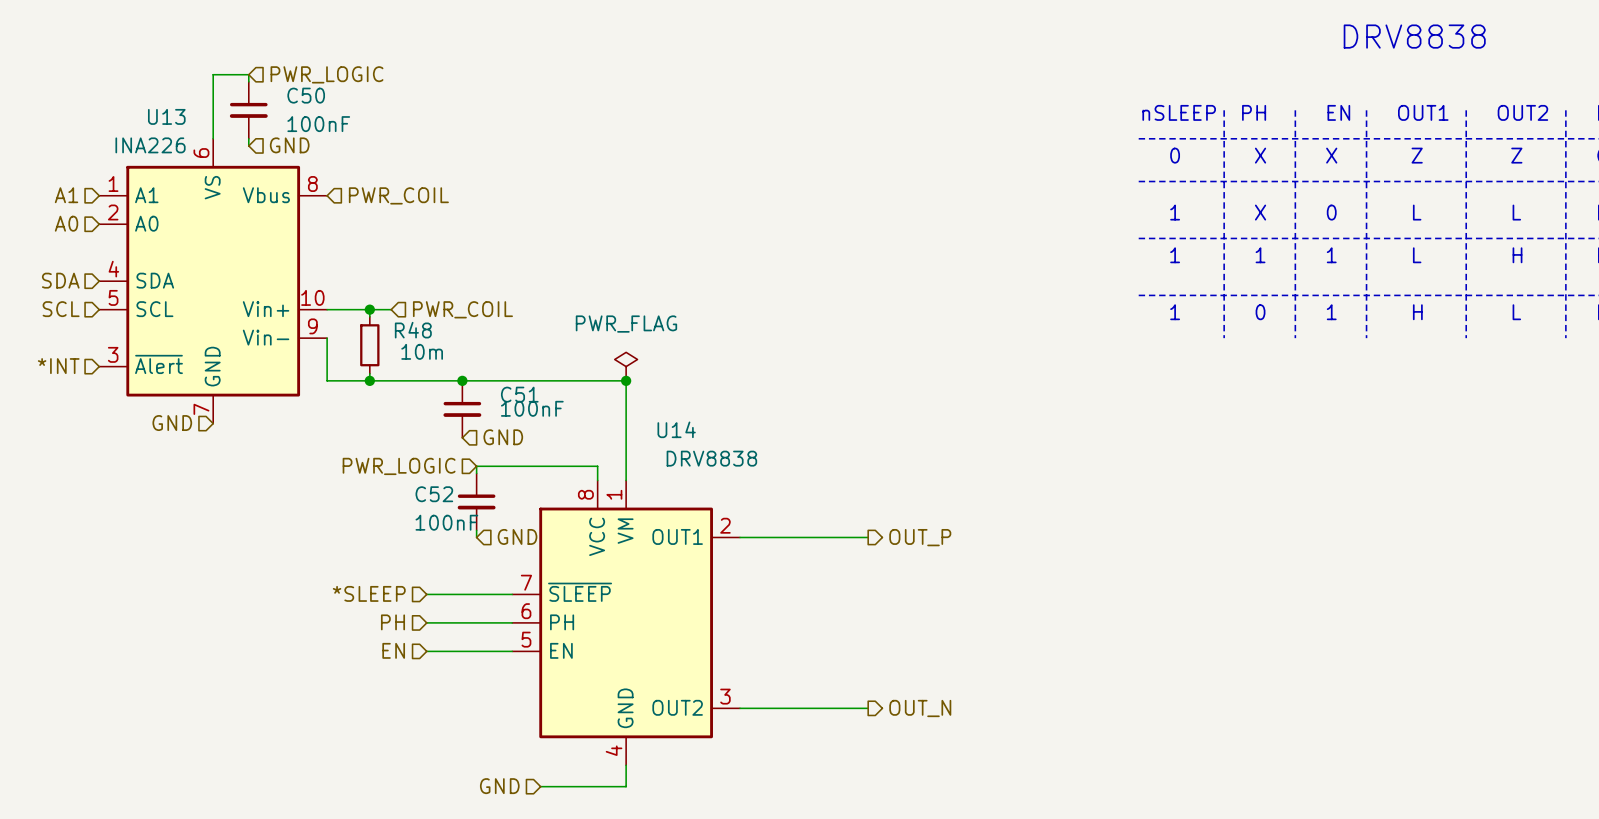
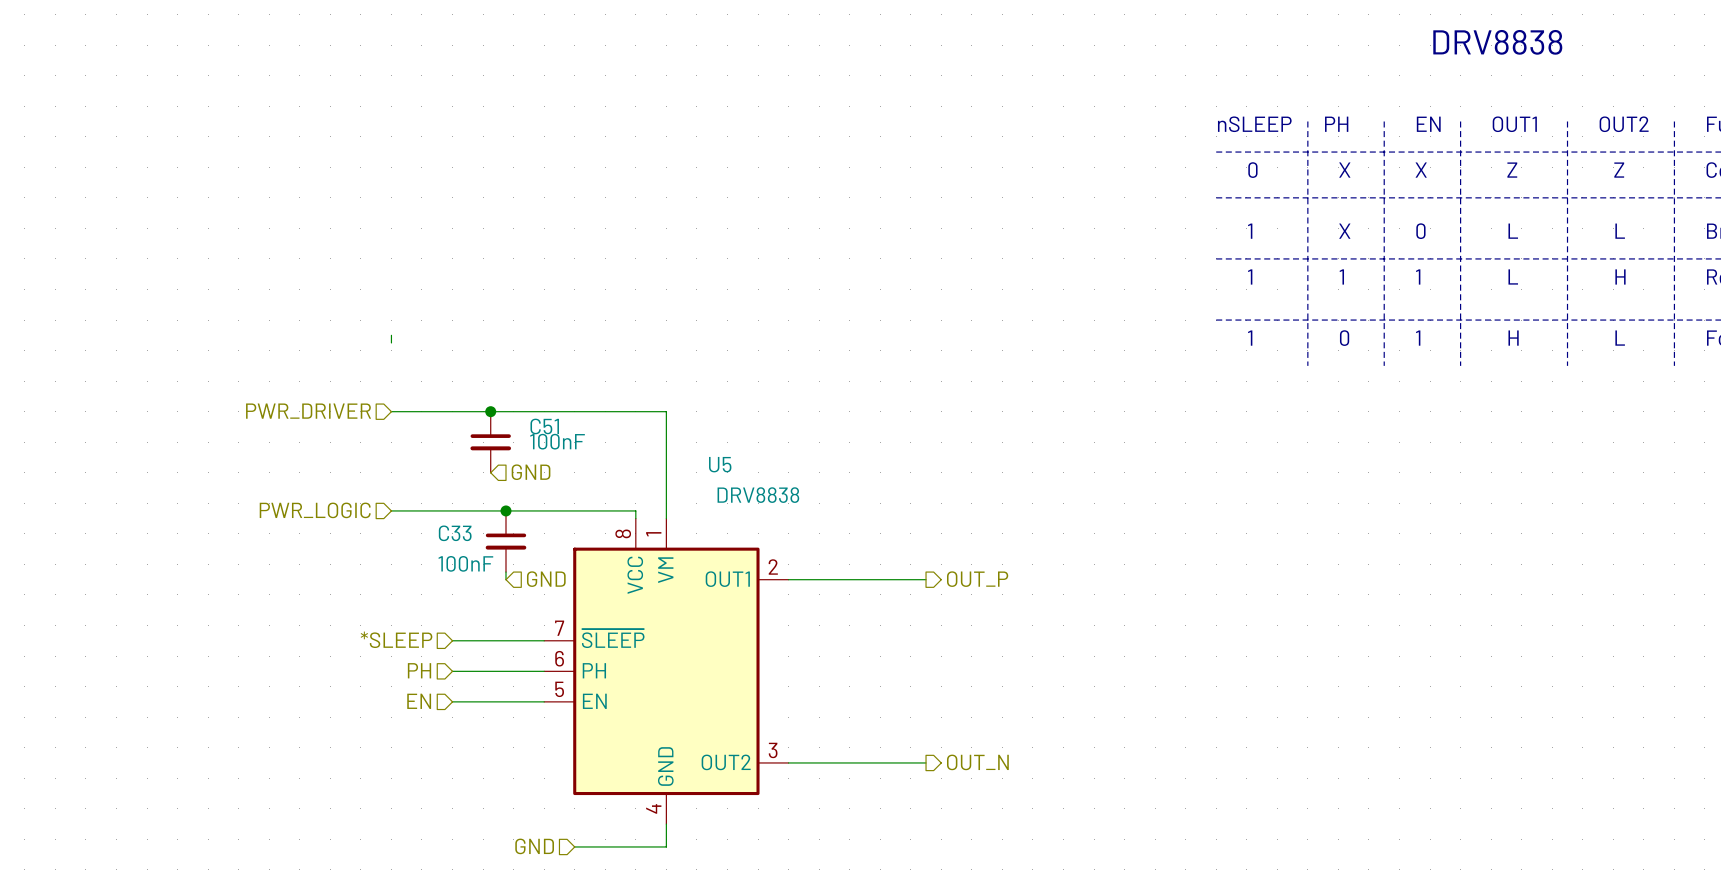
hierarchical label: PWR_LOGIC (326, 74) -> none
wire: (248, 81) (248, 74) (213, 74) (213, 138) -> none
C50: 100nF (248, 110) -> none
wire: (248, 138) (248, 145) -> none
hierarchical label: GND (289, 145) -> none
hierarchical label: A1 (66, 195) -> none
hierarchical label: PWR_COIL (398, 195) -> none
hierarchical label: A0 (66, 223) -> none
hierarchical label: SDA (60, 280) -> none
U13: INA226 (213, 281) -> none
hierarchical label: SCL (61, 309) -> none
wire: (327, 309) (391, 309) -> none
junction: (369, 309) -> none
hierarchical label: PWR_COIL (462, 309) -> none
wire: (327, 338) (327, 380) (369, 380) (369, 373) -> none
R48: 10m (369, 345) -> none
hierarchical label: *INT (58, 366) -> none
power symbol: PWR_FLAG (626, 366) -> none
junction: (369, 380) -> none
junction: (626, 380) -> none
hierarchical label: none -> PWR_DRIVER (308, 411)
hierarchical label: GND (172, 423) -> none
U14 name: U14 (676, 429) -> U5 (720, 464)
hierarchical label position: PWR_LOGIC (399, 466) -> PWR_LOGIC (315, 510)
wire: (476, 473) (476, 466) (597, 466) (597, 473) -> (391, 510) (635, 510)
junction: none -> (506, 510)
C52 name: C52 (434, 494) -> C33 (455, 533)

